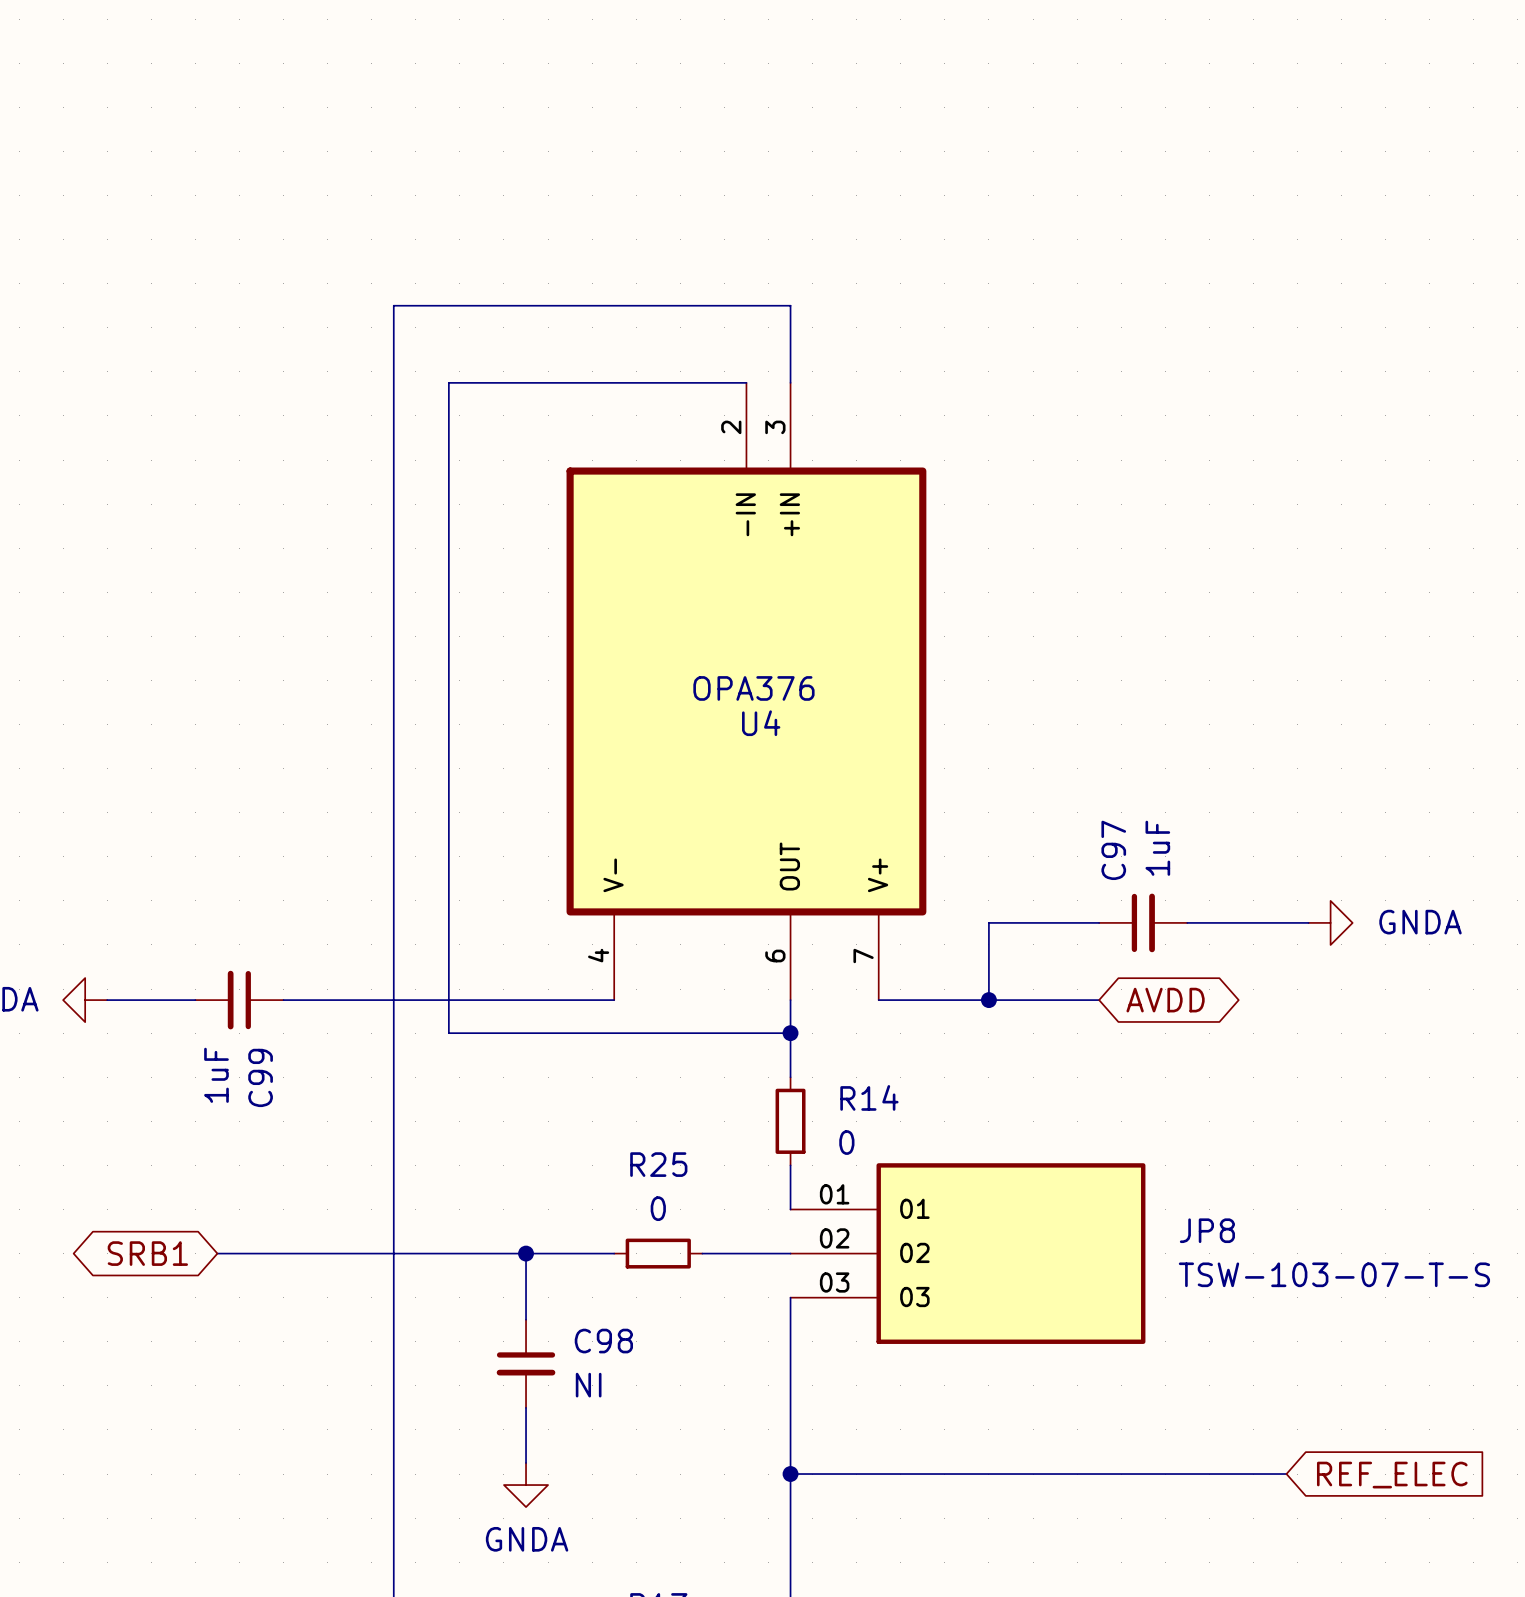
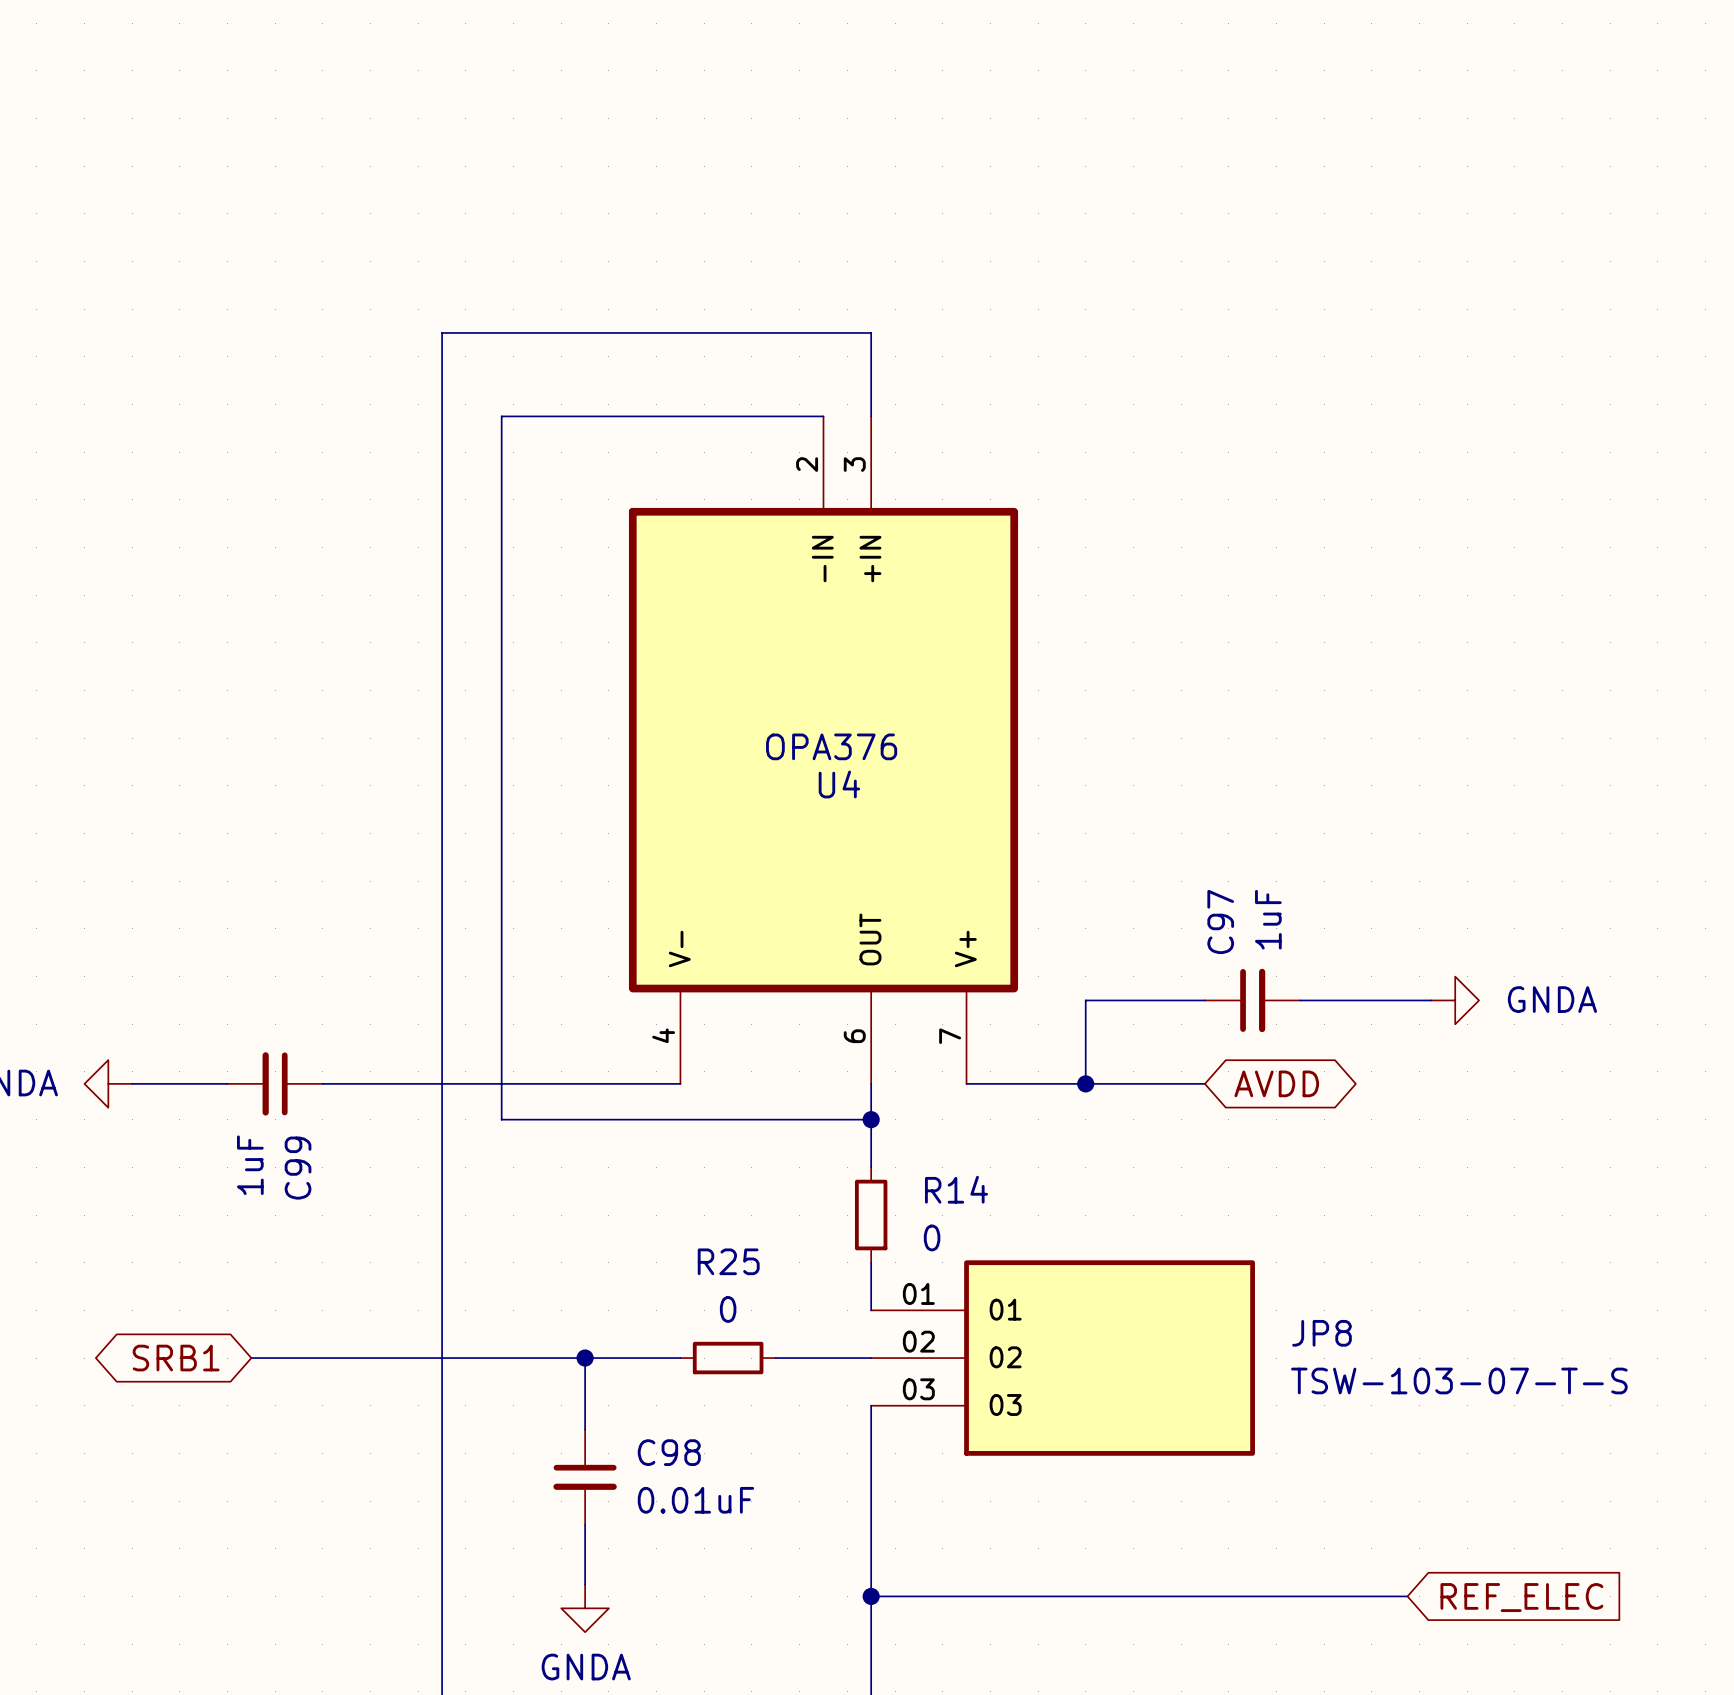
C98 value: NI (588, 1385) -> 0.01uF (695, 1500)

